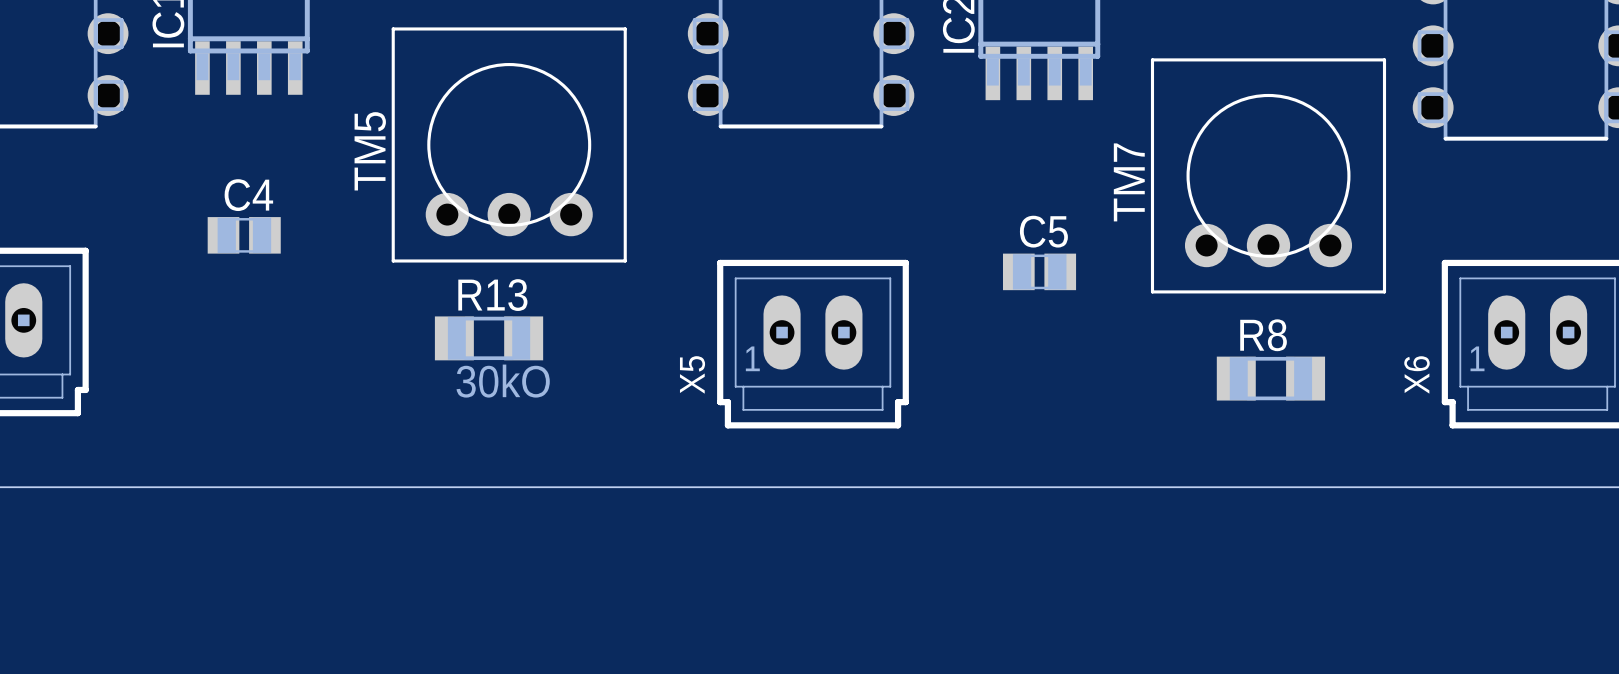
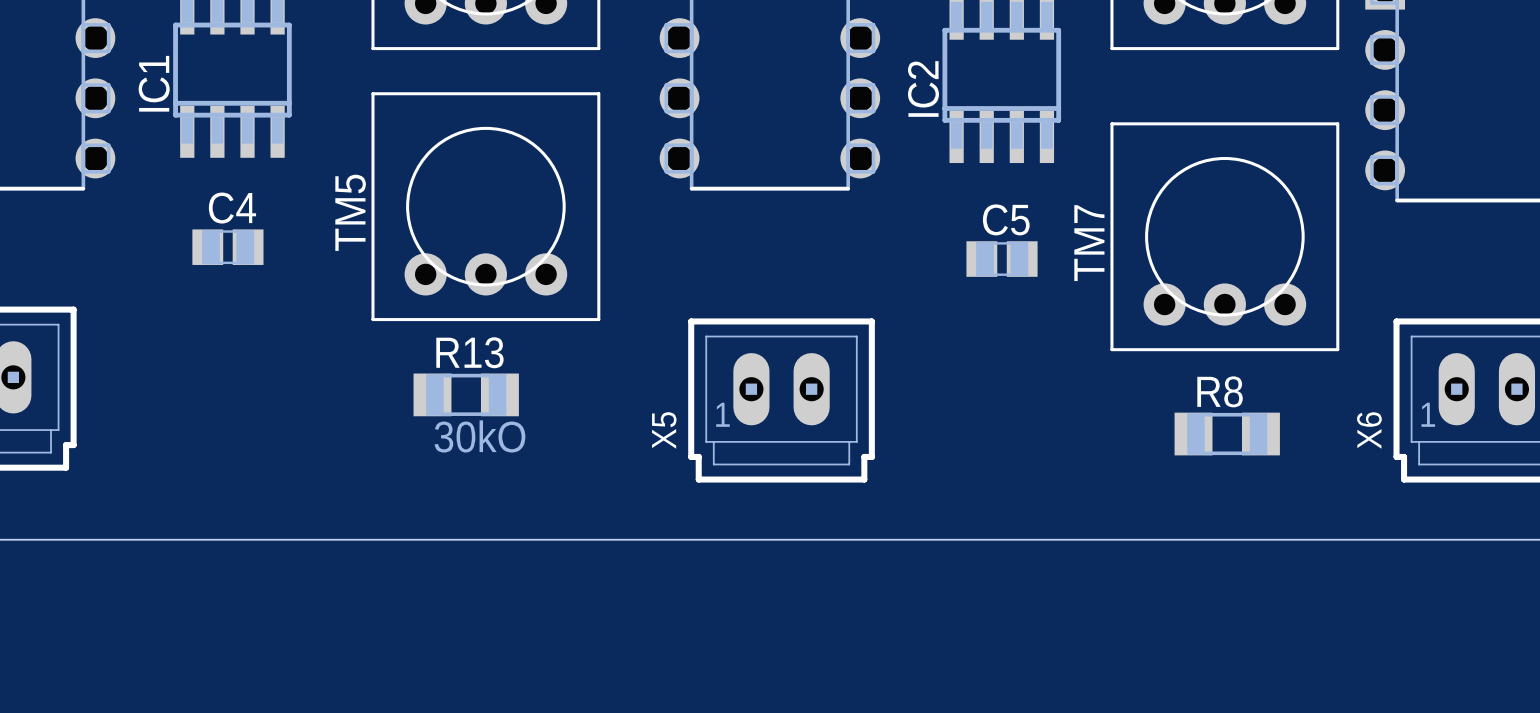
C4 position: (244, 235) -> (227, 247)
C5 position: (1039, 271) -> (1002, 259)

